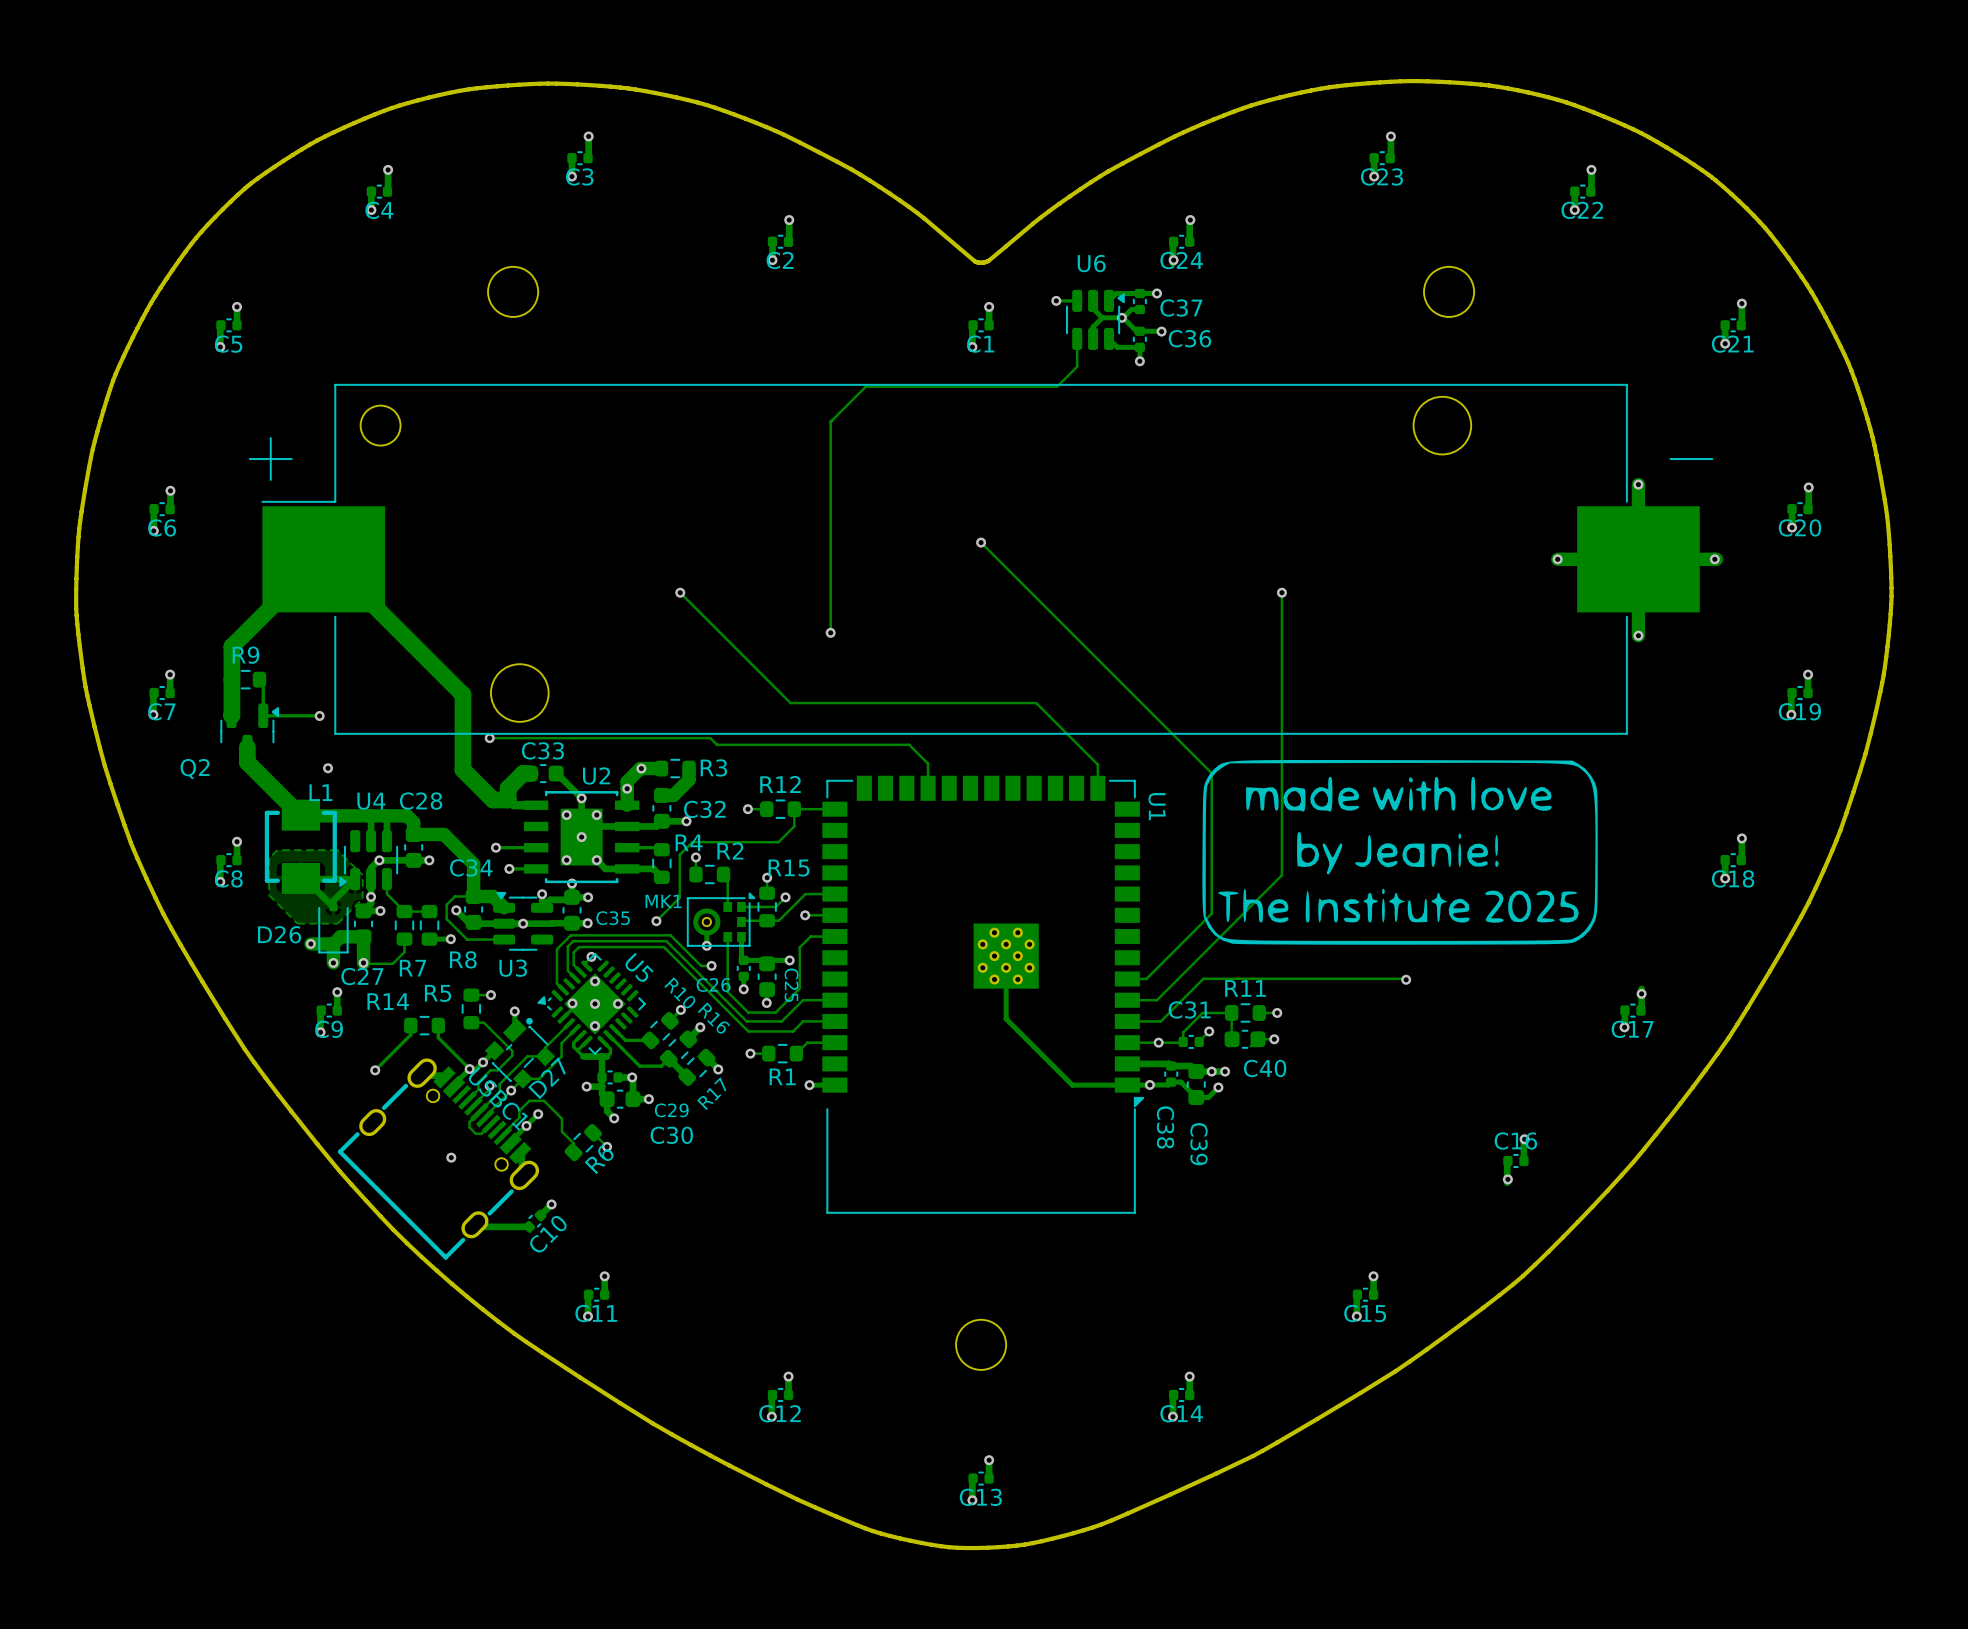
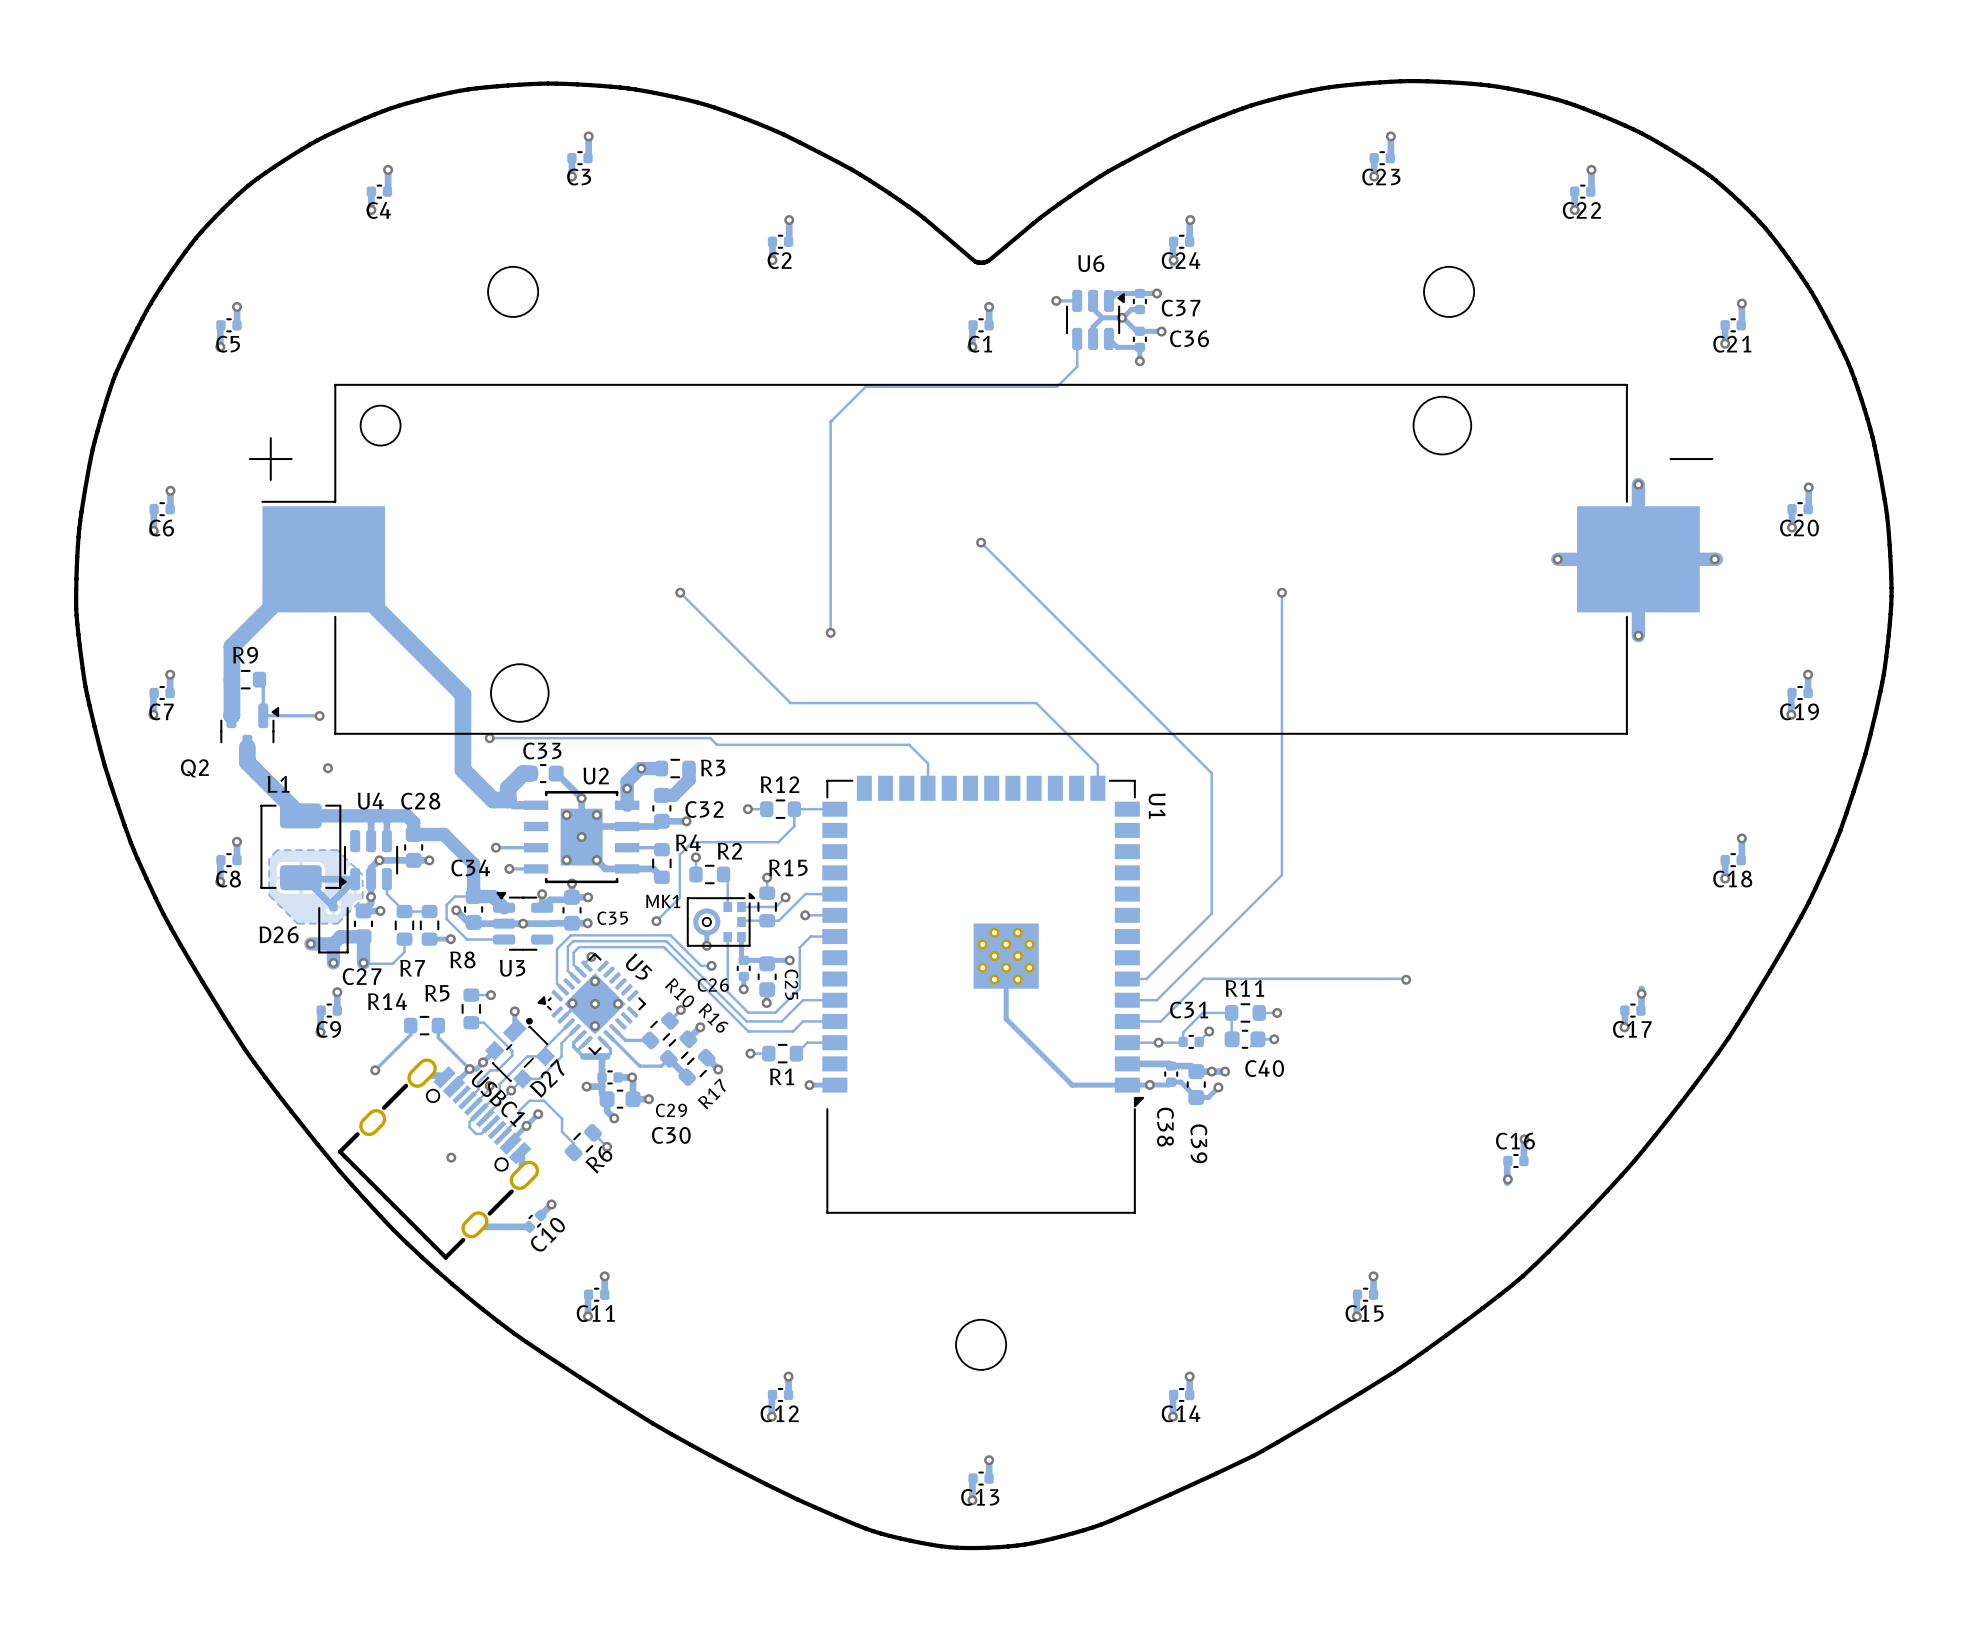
drawing: [1202, 759, 1598, 945] -> none
L1 name position: L1 (320, 792) -> L1 (278, 784)
L1 footprint: [264, 799, 337, 894] -> [260, 803, 342, 891]

